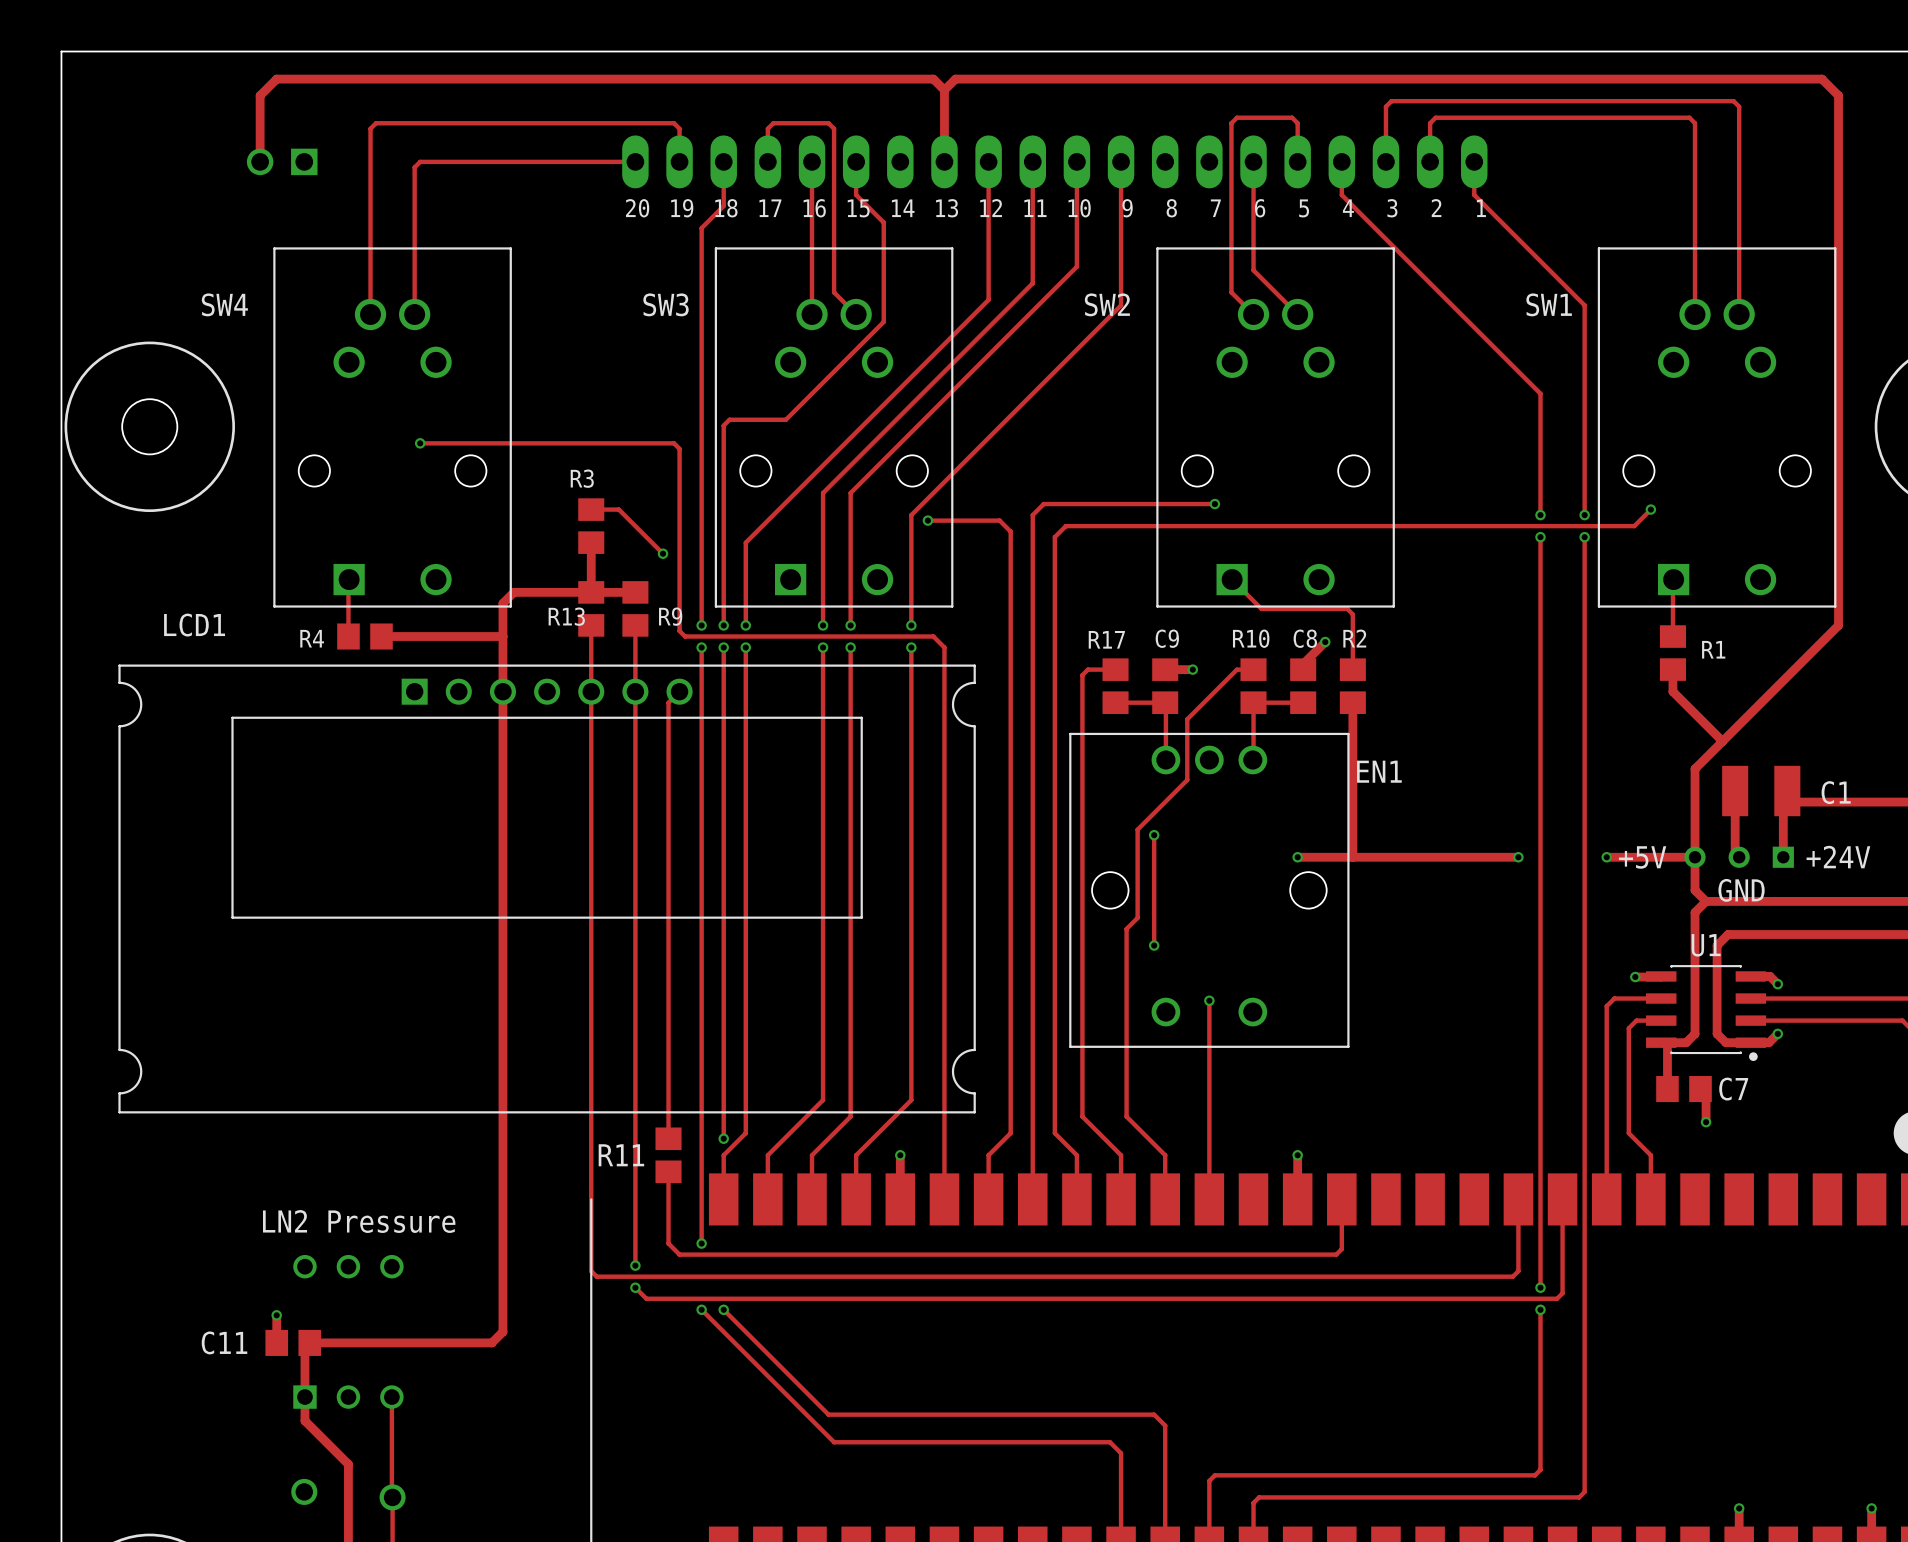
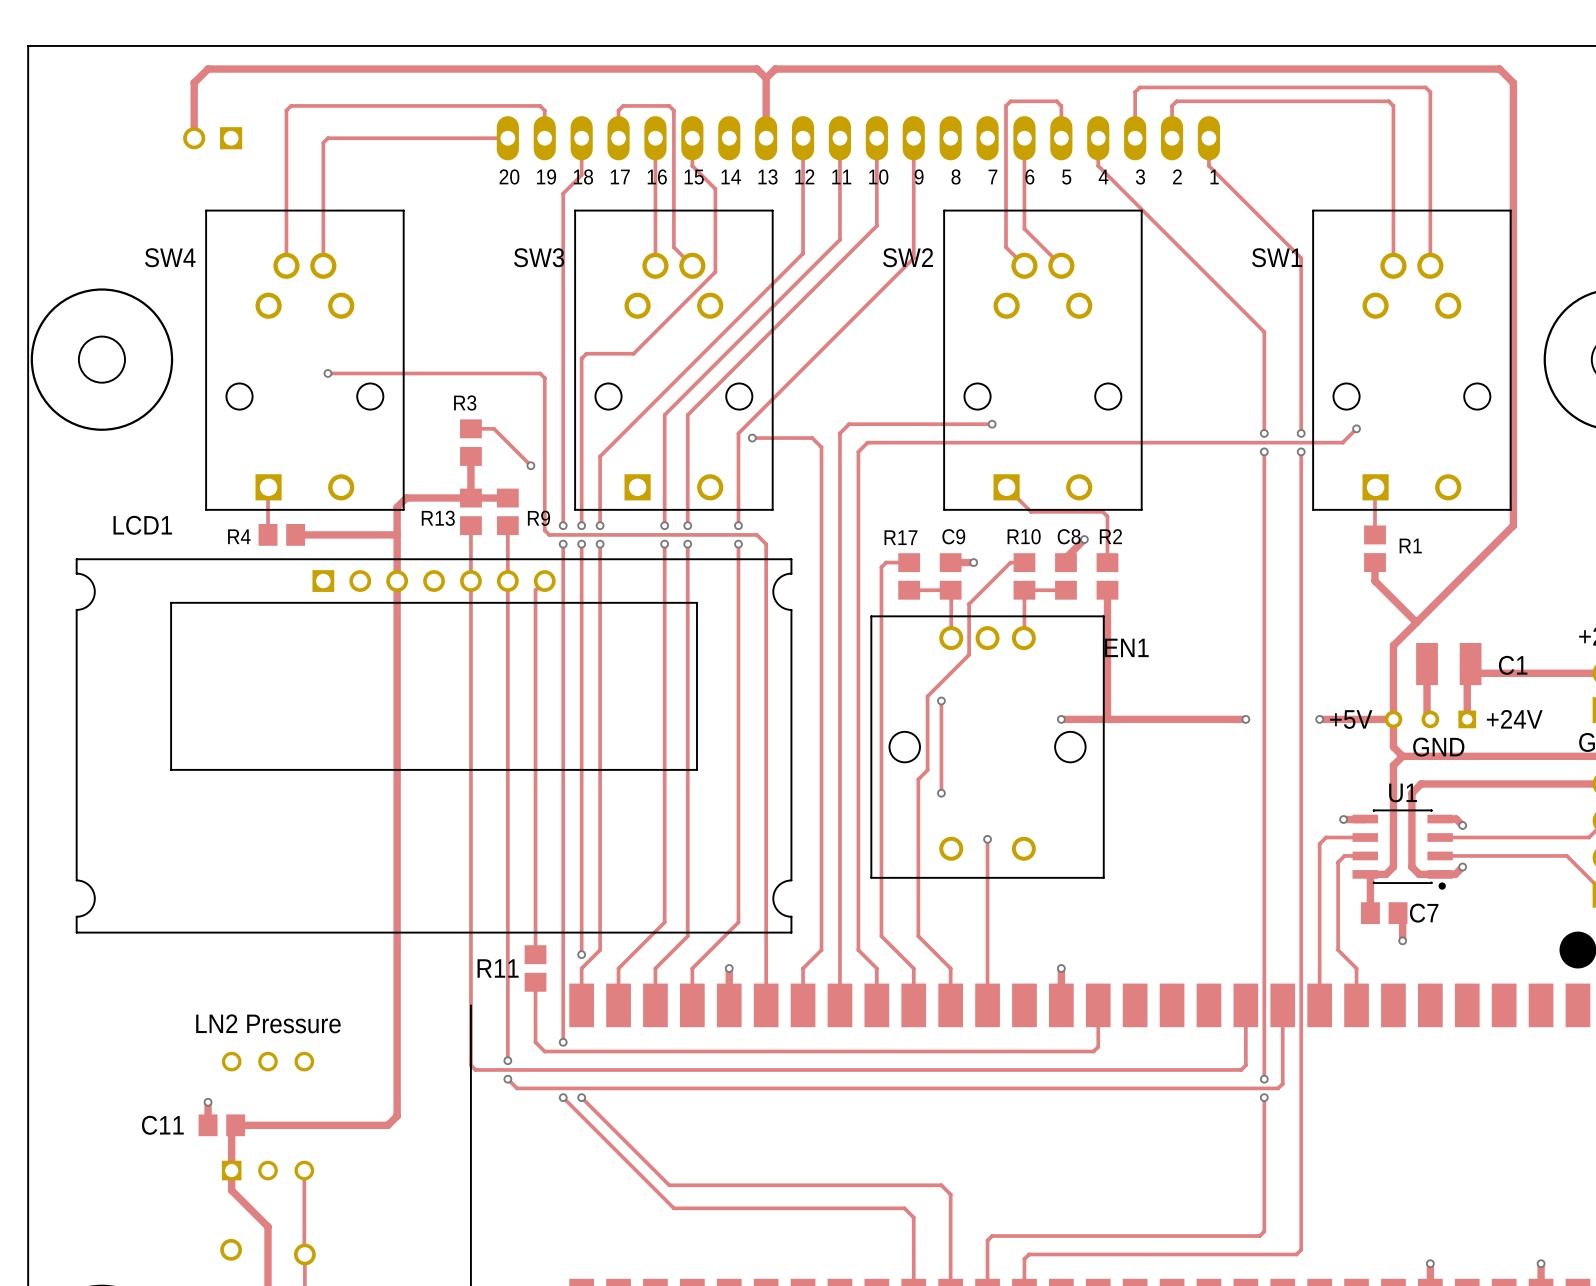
R13 name position: R13 (566, 616) -> R13 (438, 518)

